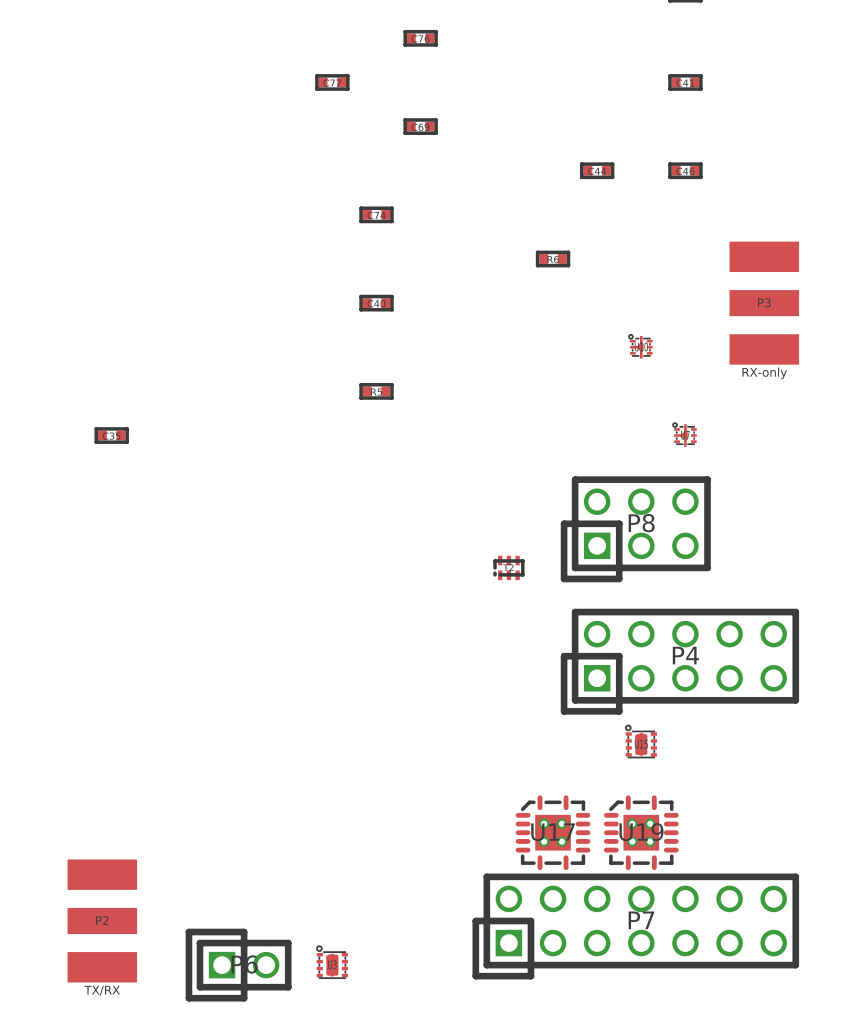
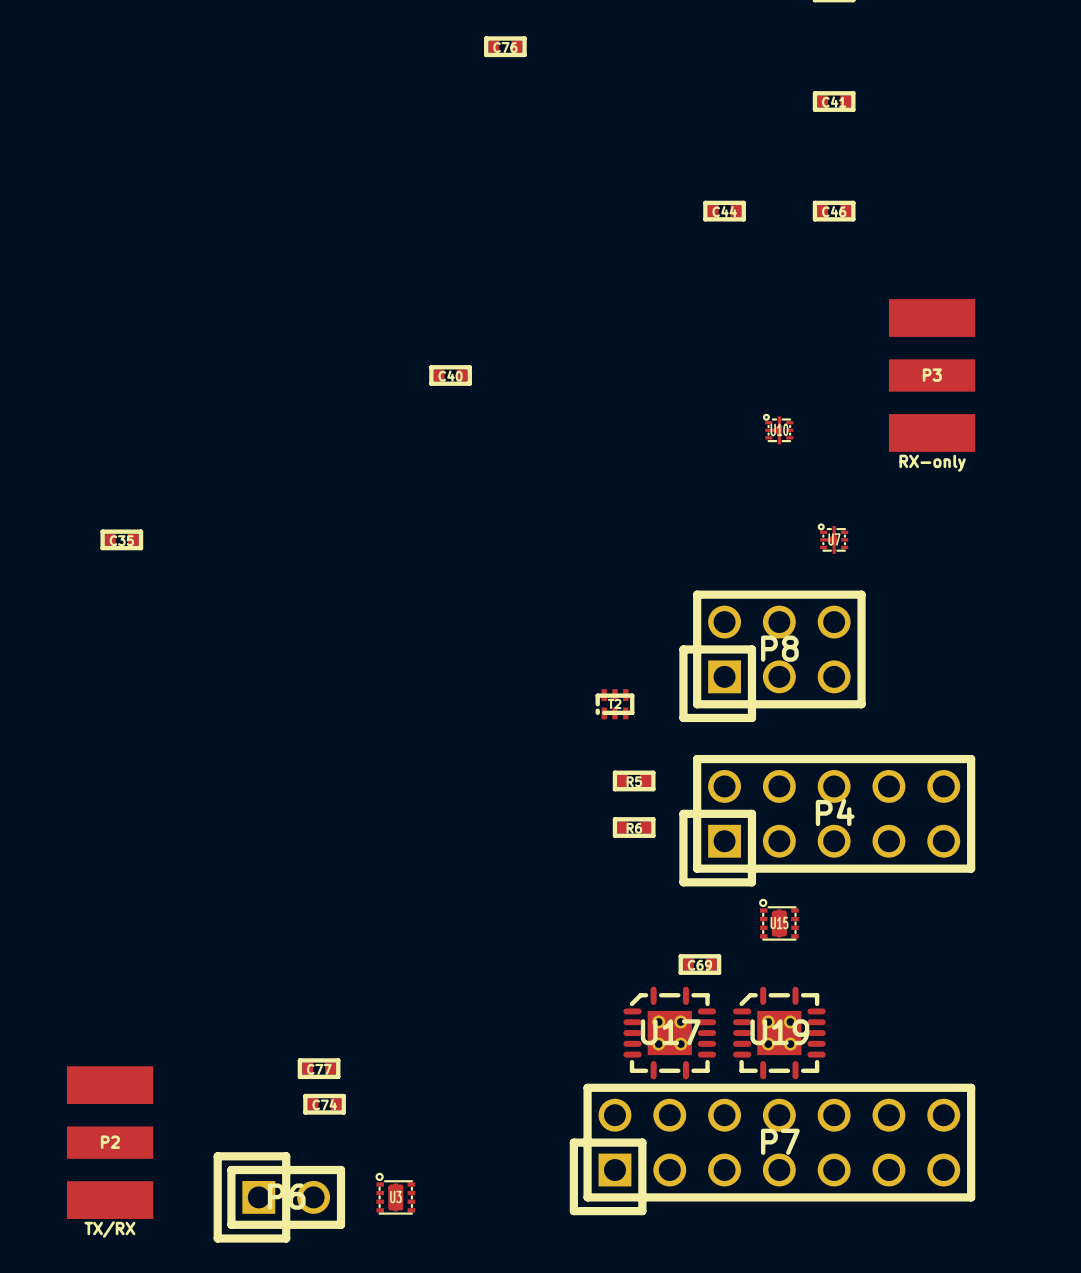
C77 position: (332, 82) -> (319, 1068)
C69 position: (420, 126) -> (699, 964)
C74 position: (376, 214) -> (324, 1104)
R6 position: (553, 259) -> (634, 827)
R5 position: (376, 391) -> (634, 780)

